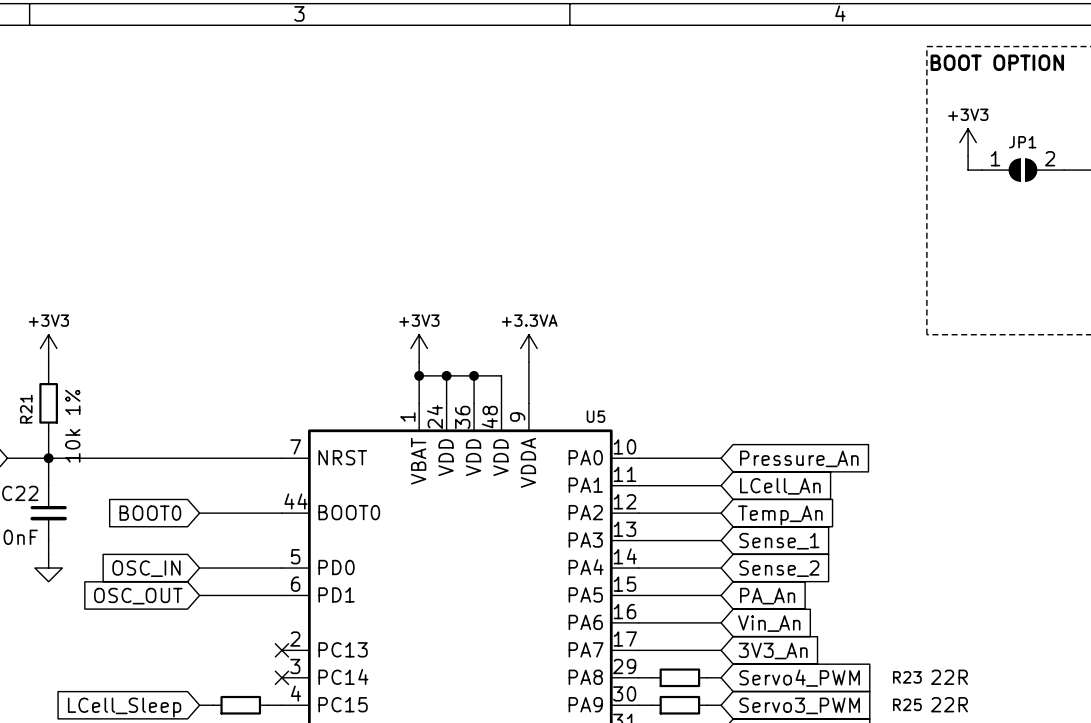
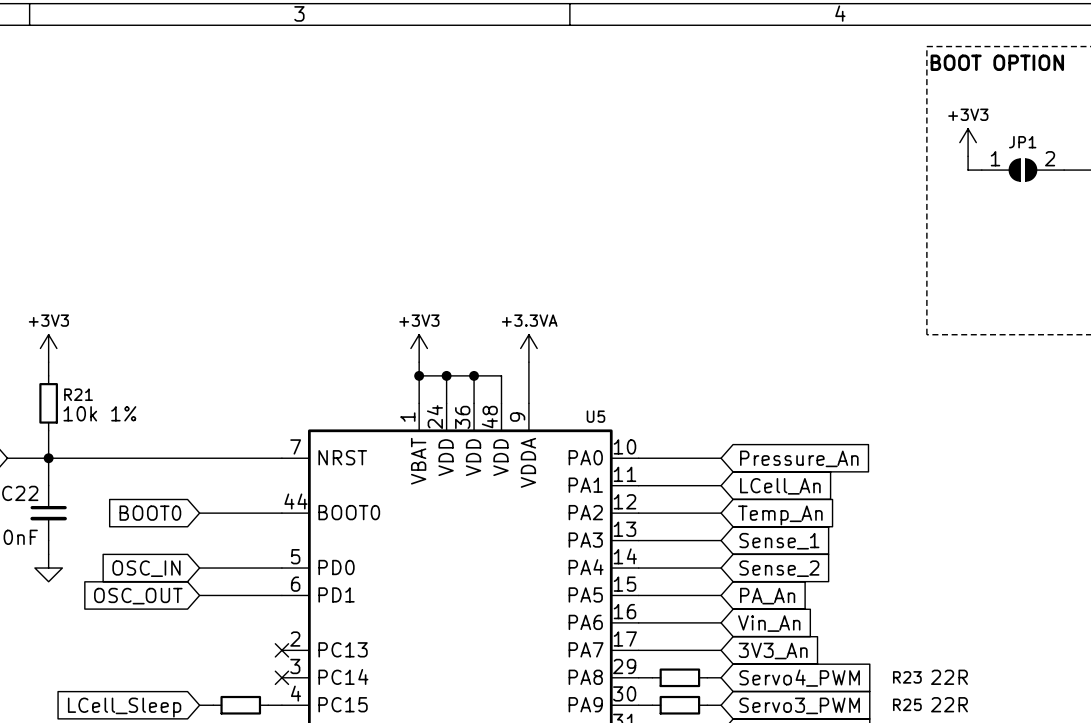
R21 name rotation: 0° (26, 409) -> 90° clockwise (78, 394)
R21 name position: R21 (26, 409) -> R21 (78, 394)
R21 value rotation: 0° (72, 426) -> 90° clockwise (99, 413)

